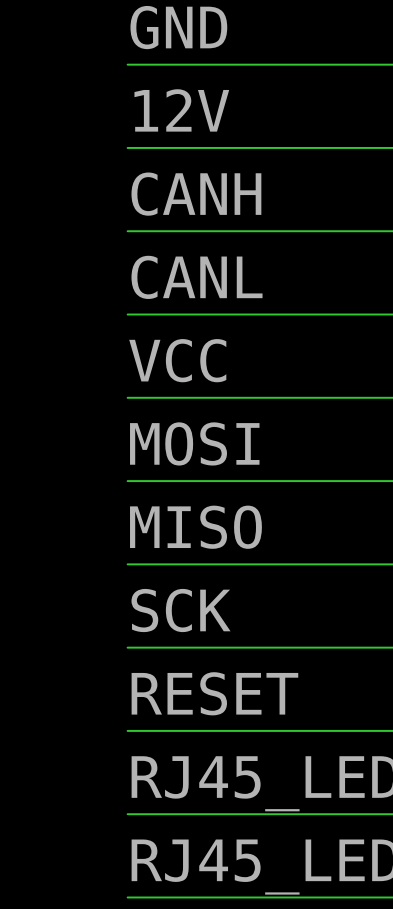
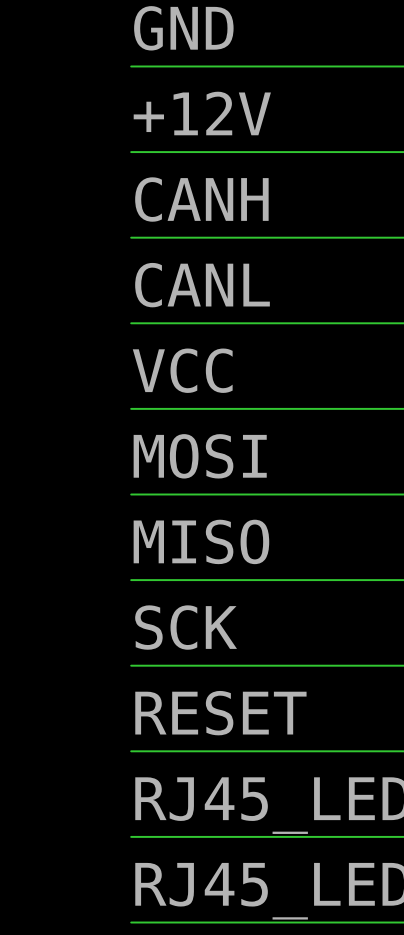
label: 12V (181, 110) -> +12V (202, 113)

